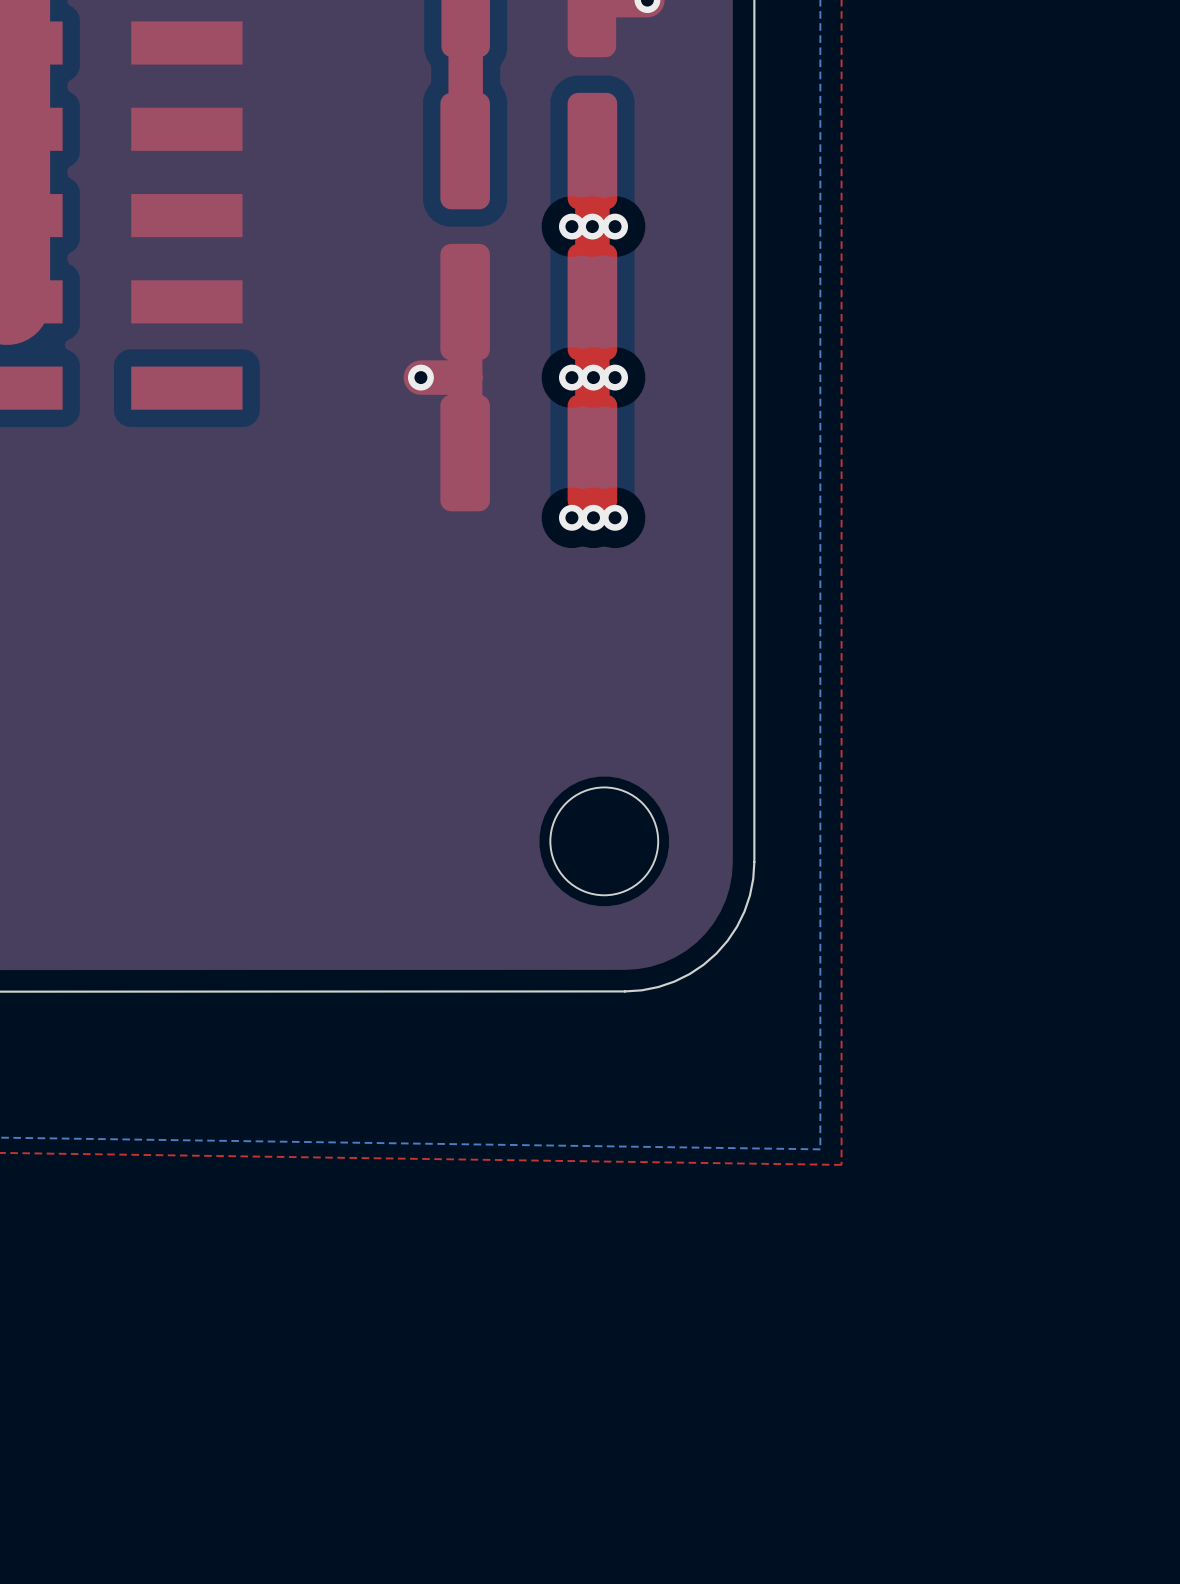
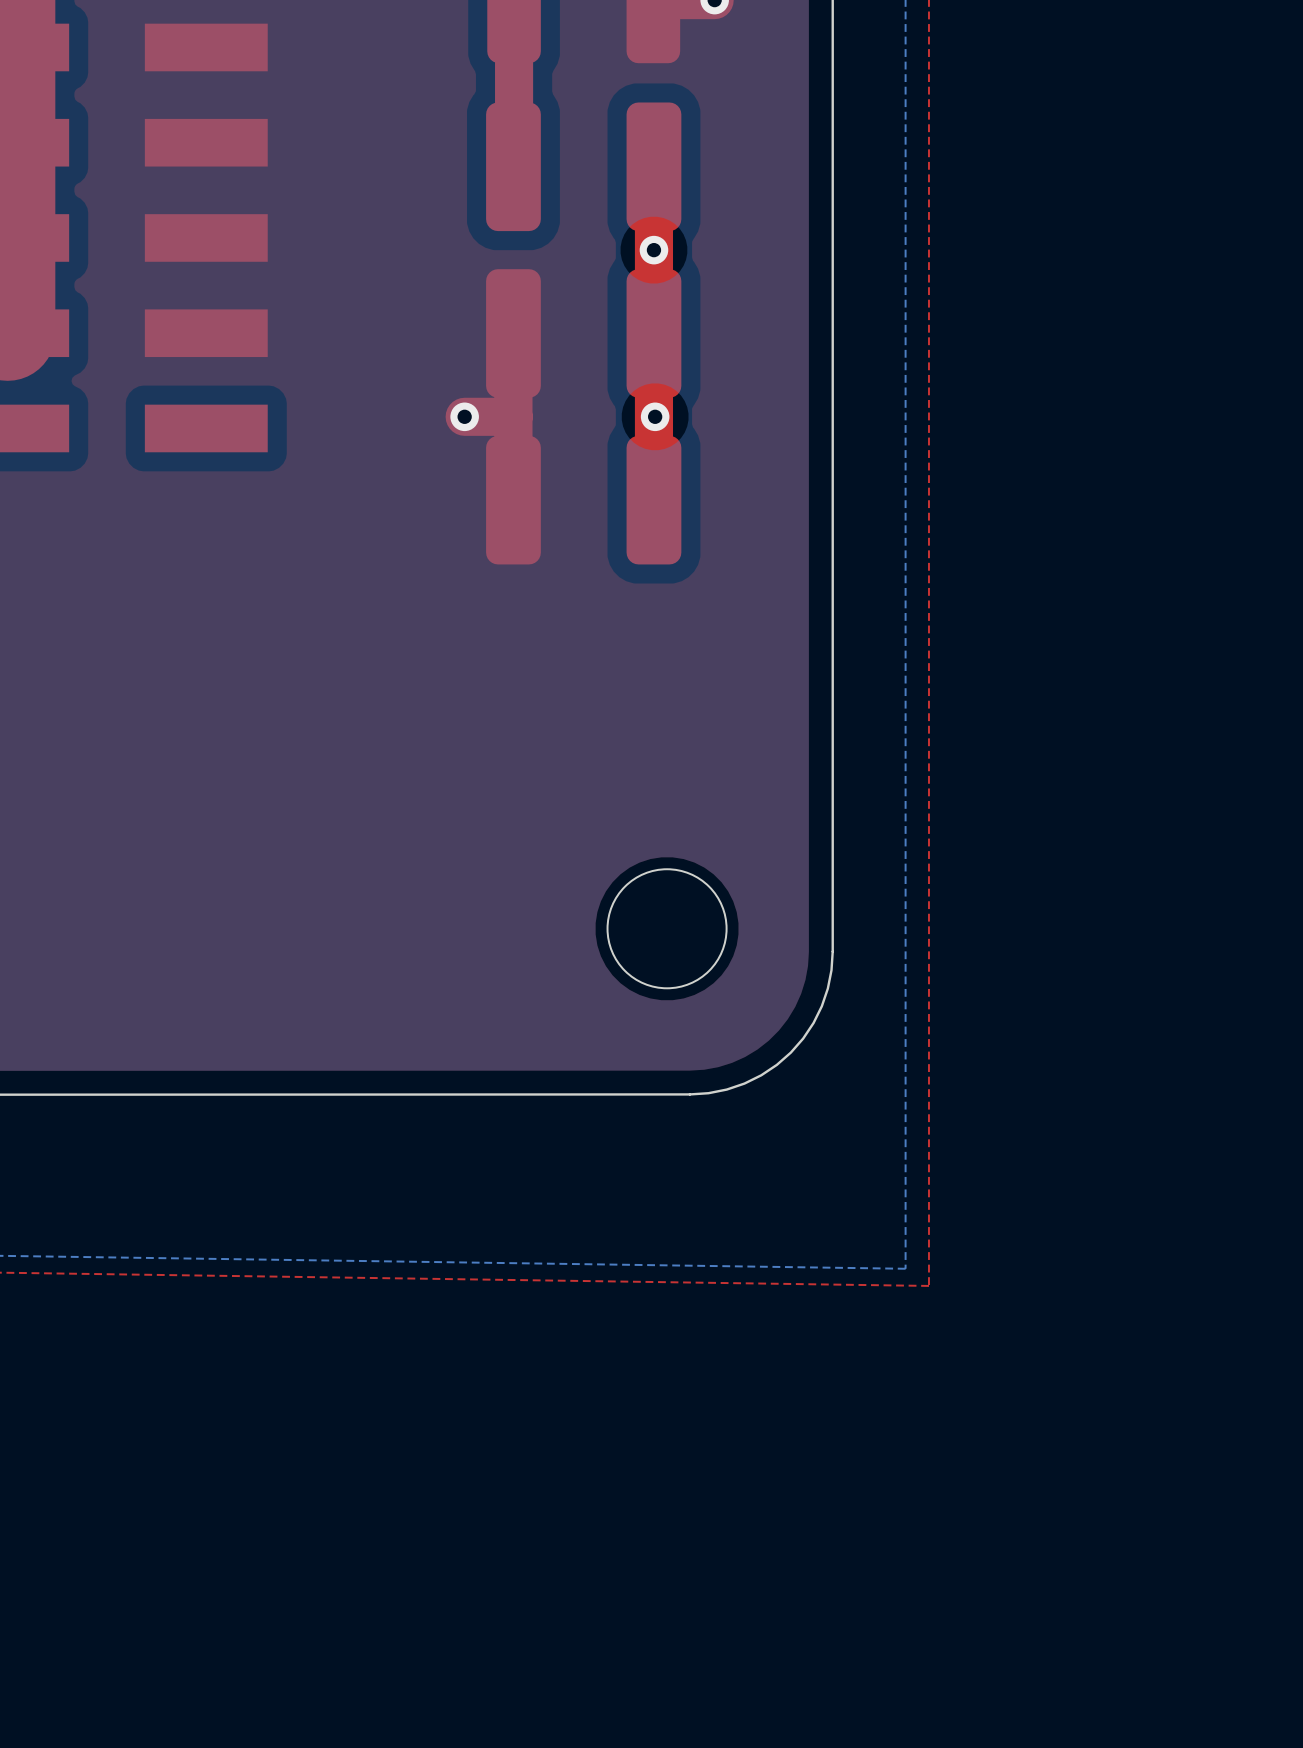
via: (571, 226) -> none
via: (615, 226) -> none
via: (571, 377) -> none
via: (615, 377) -> none
via: (571, 517) -> none
via: (593, 517) -> none
via: (615, 517) -> none

